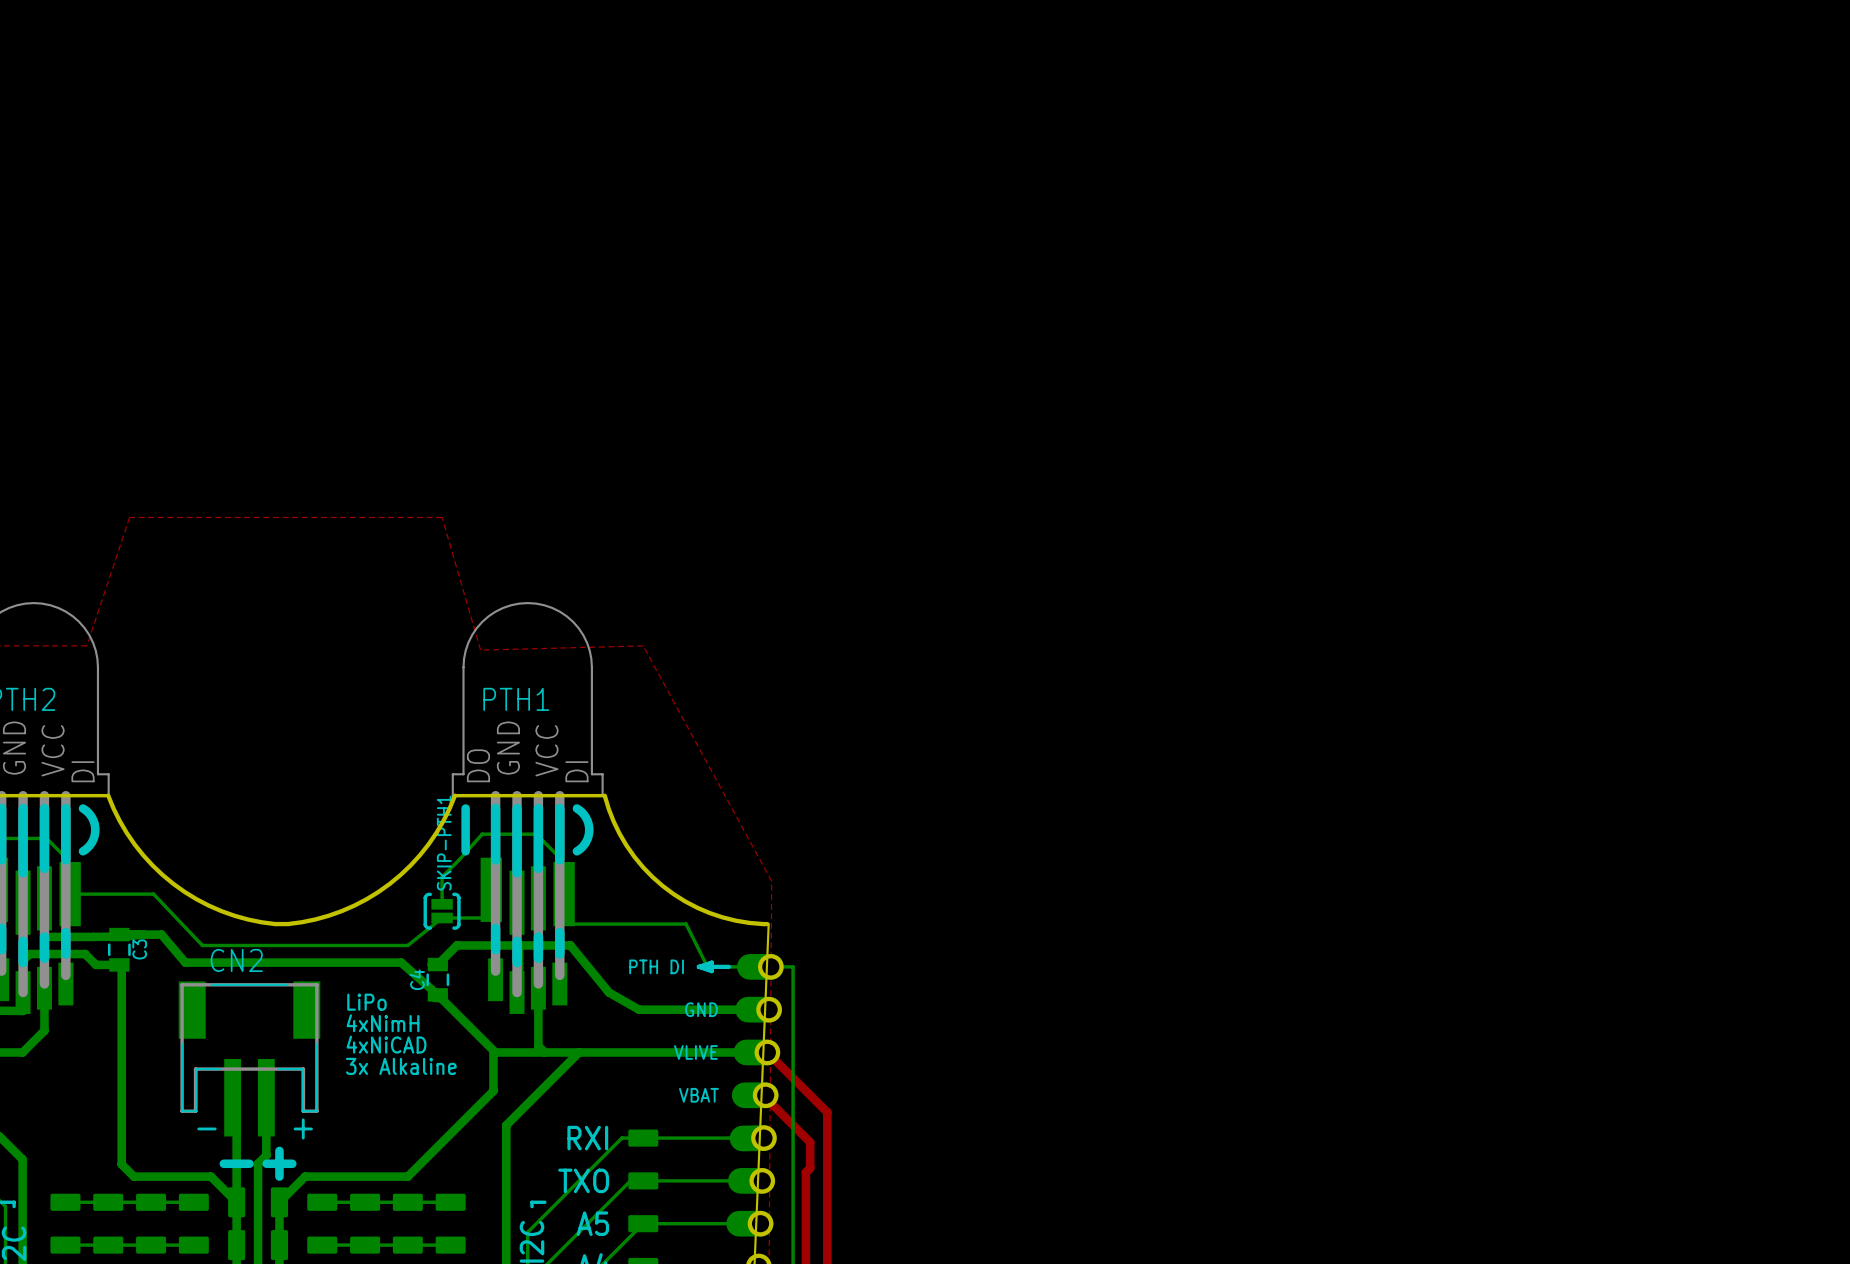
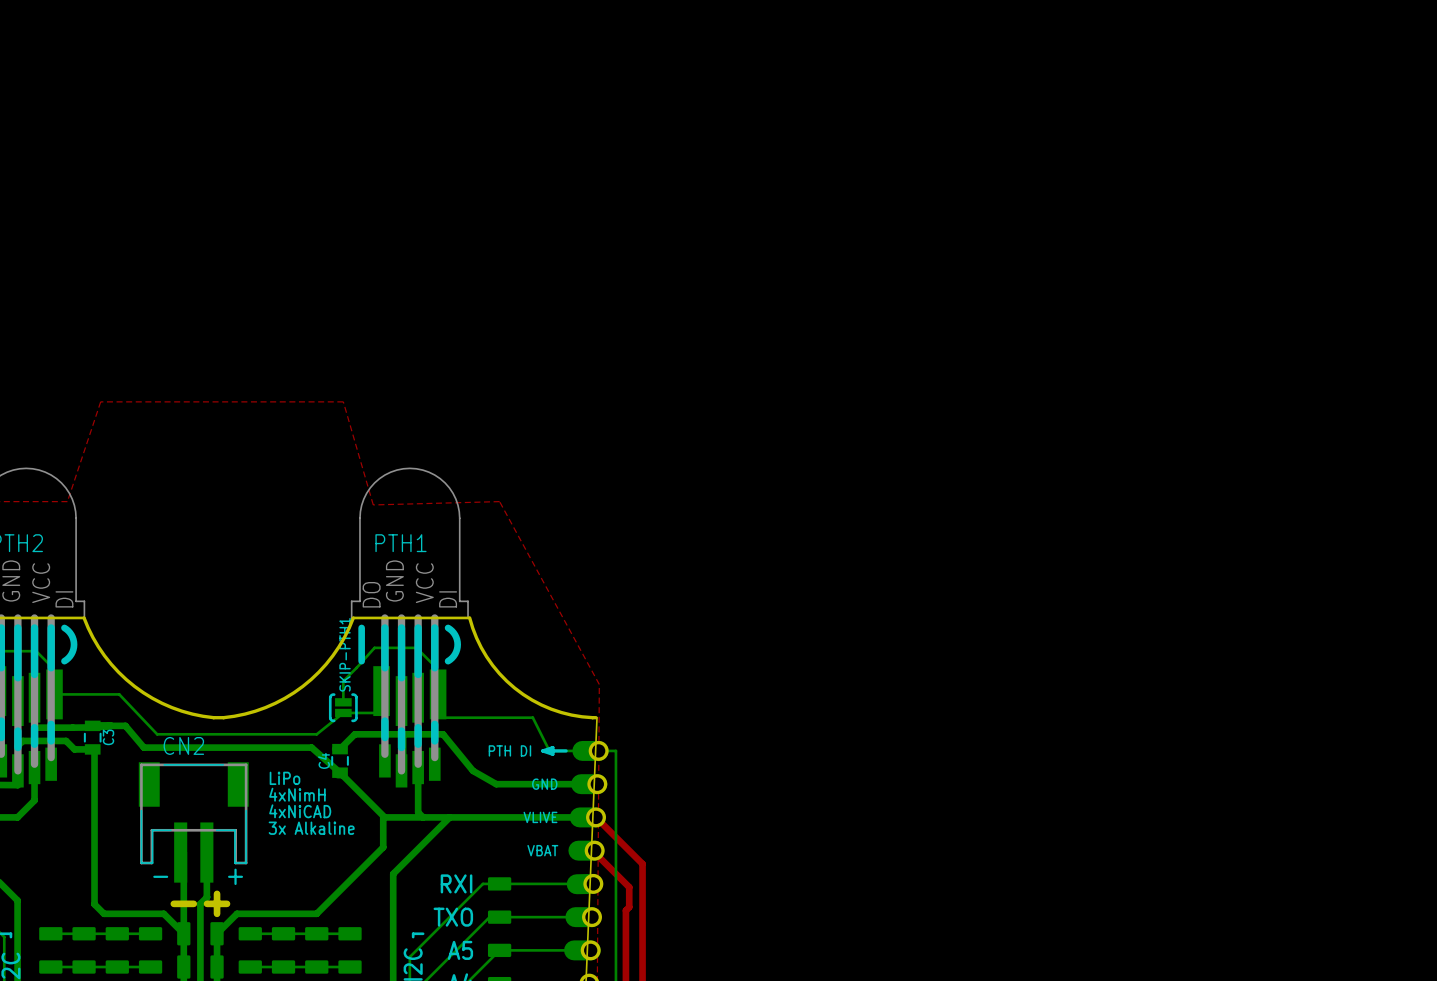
board edge: none -> (217, 893) (217, 913)
line: (279, 1150) (279, 1176) -> none
board edge: none -> (193, 903) (173, 903)
line: (249, 1163) (223, 1163) -> none
board edge: none -> (227, 903) (207, 903)
line: (292, 1163) (266, 1163) -> none

